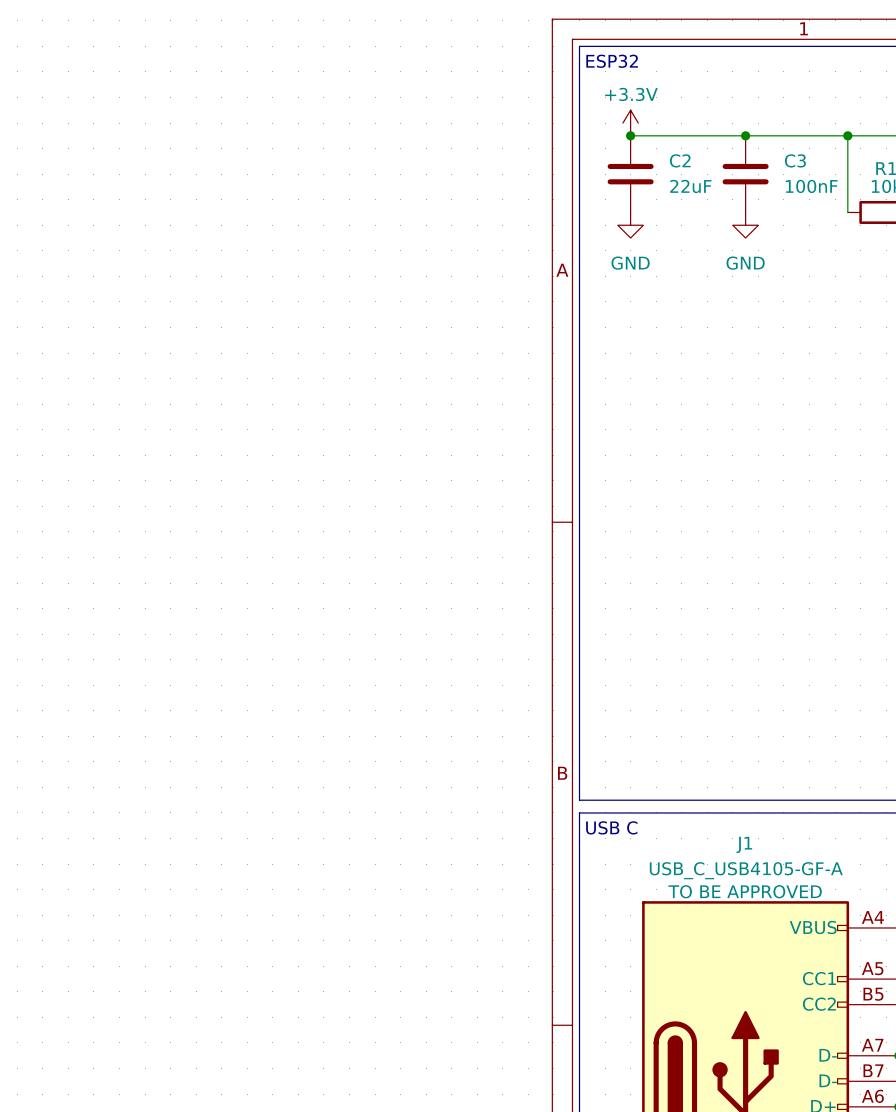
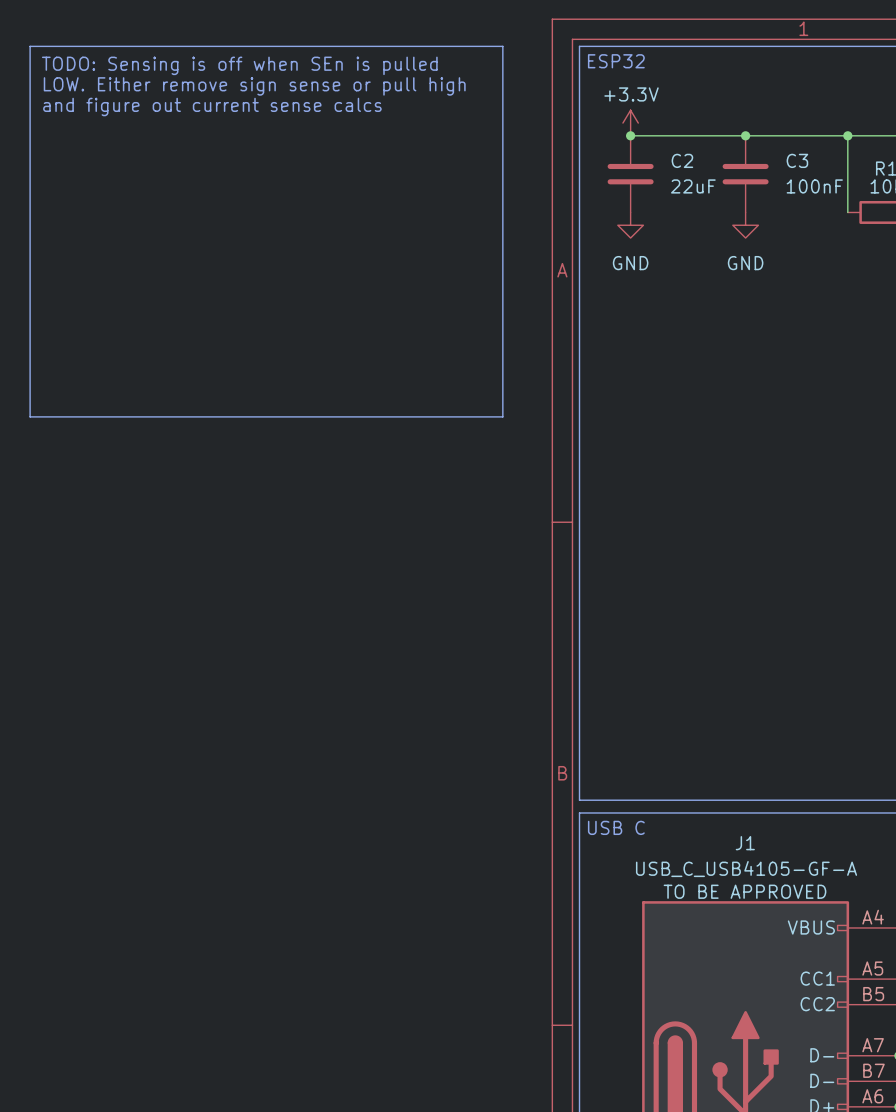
line: none -> (30, 46) (502, 46) (502, 416) (30, 416) (30, 46)
text: none -> TODO: Sensing is off when SEn is pulled (239, 65)
text: none -> LOW. Either remove sign sense or pull high (254, 86)
text: none -> and figure out current sense calcs (212, 106)

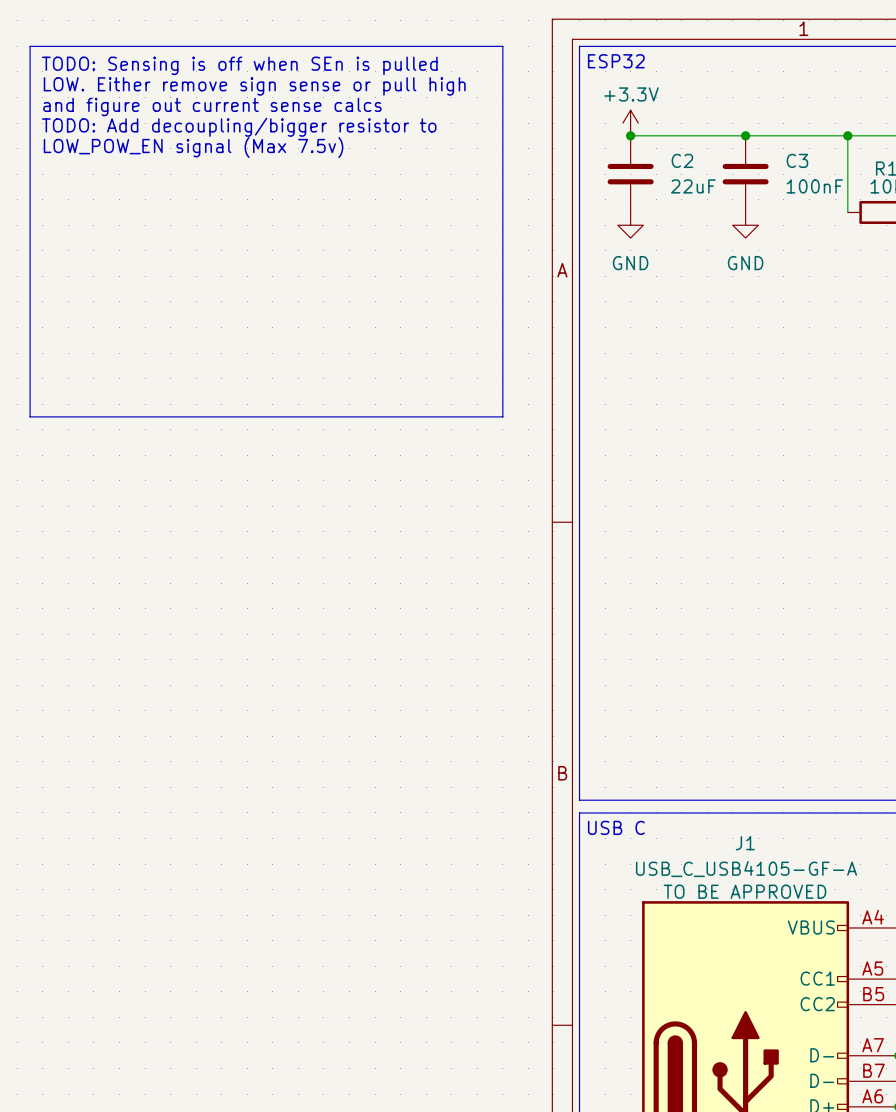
text: none -> TODO: Add decoupling/bigger resistor to (239, 127)
text: none -> LOW_POW_EN signal (Max 7.5v) (193, 147)

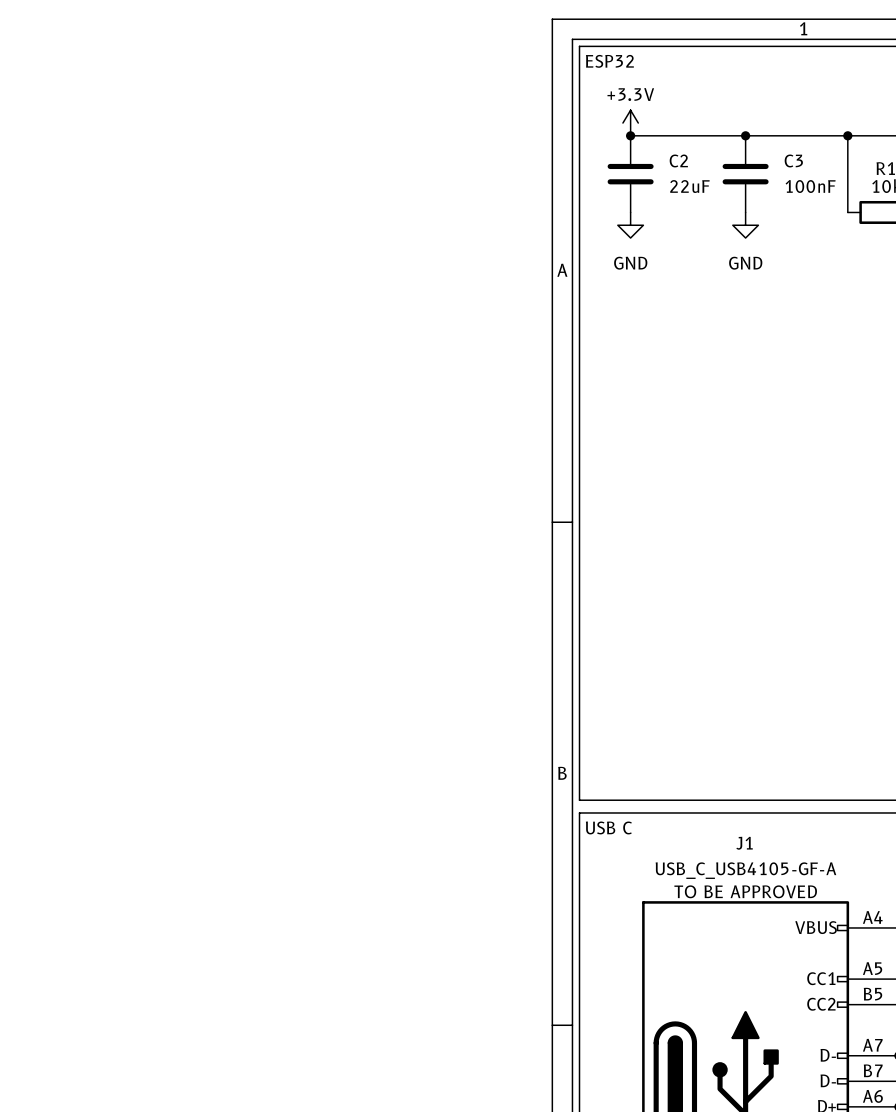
line: (30, 46) (502, 46) (502, 416) (30, 416) (30, 46) -> none
text: TODO: Sensing is off when SEn is pulled (239, 65) -> none
text: LOW. Either remove sign sense or pull high (254, 86) -> none
text: and figure out current sense calcs (212, 106) -> none
text: TODO: Add decoupling/bigger resistor to (239, 127) -> none
text: LOW_POW_EN signal (Max 7.5v) (193, 147) -> none

